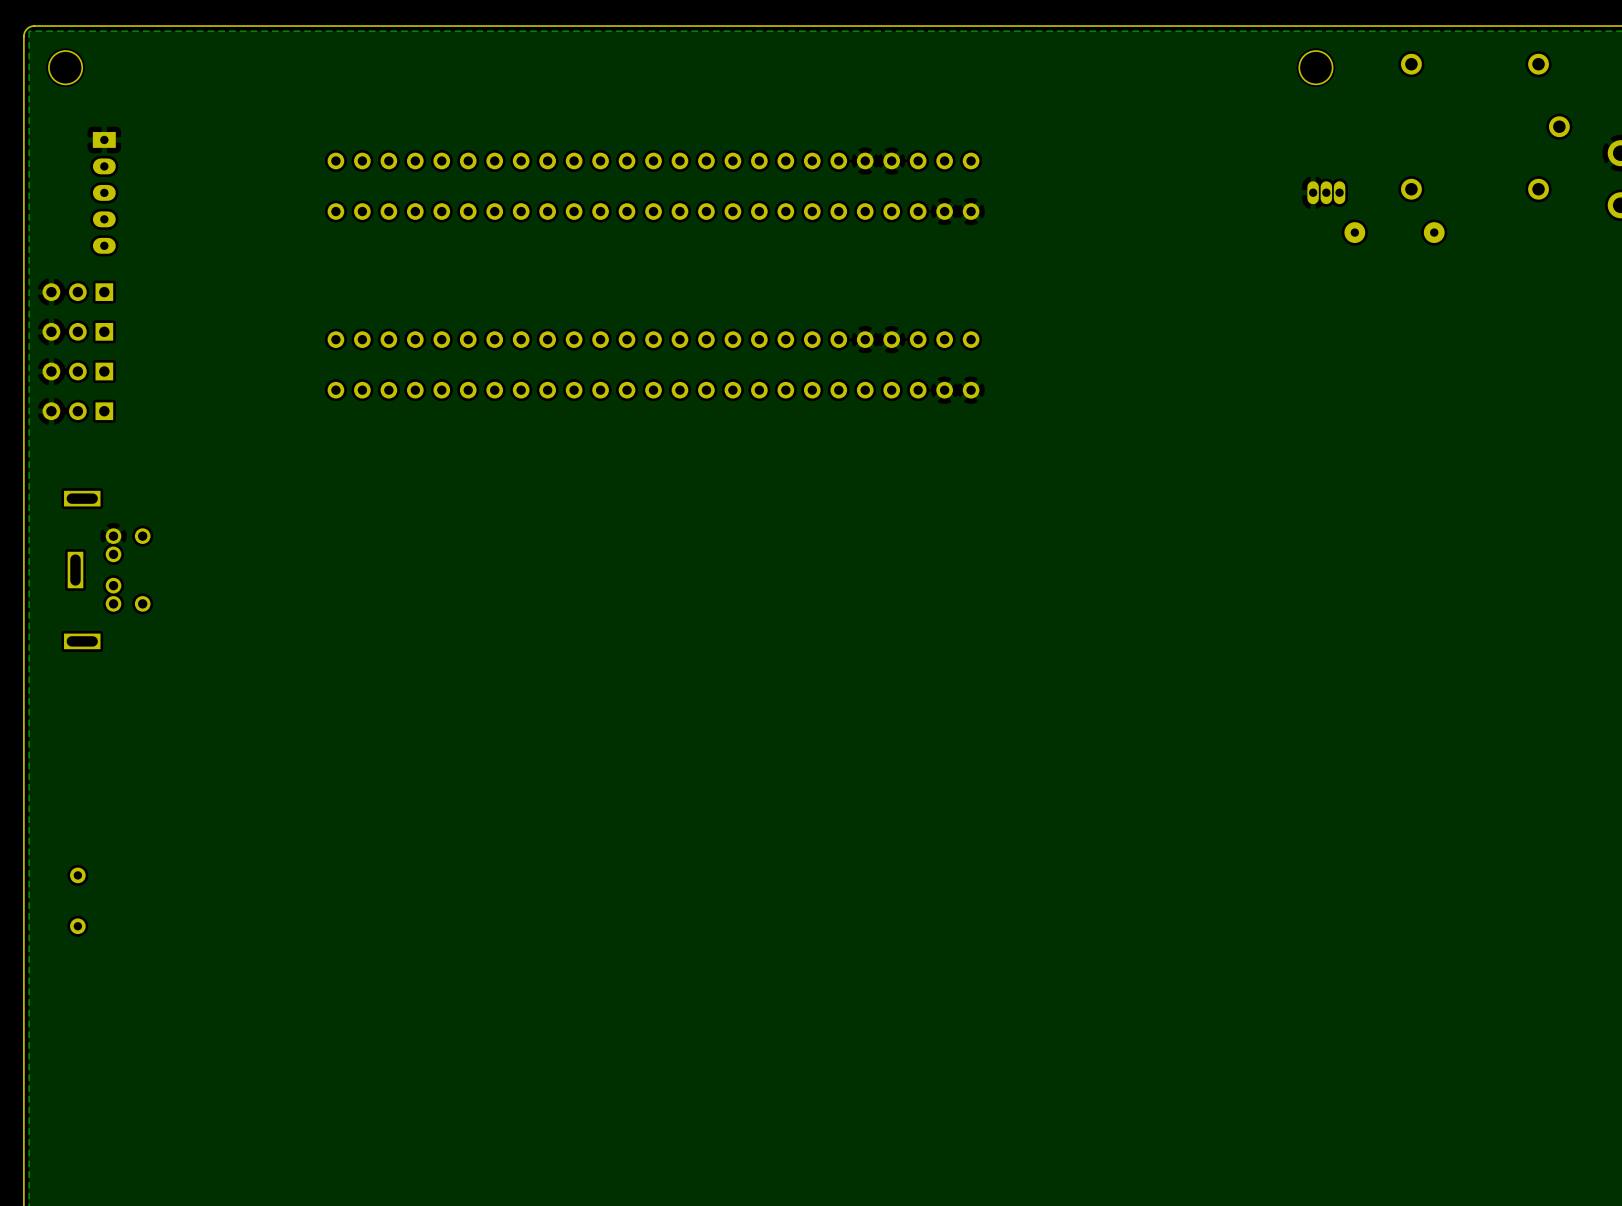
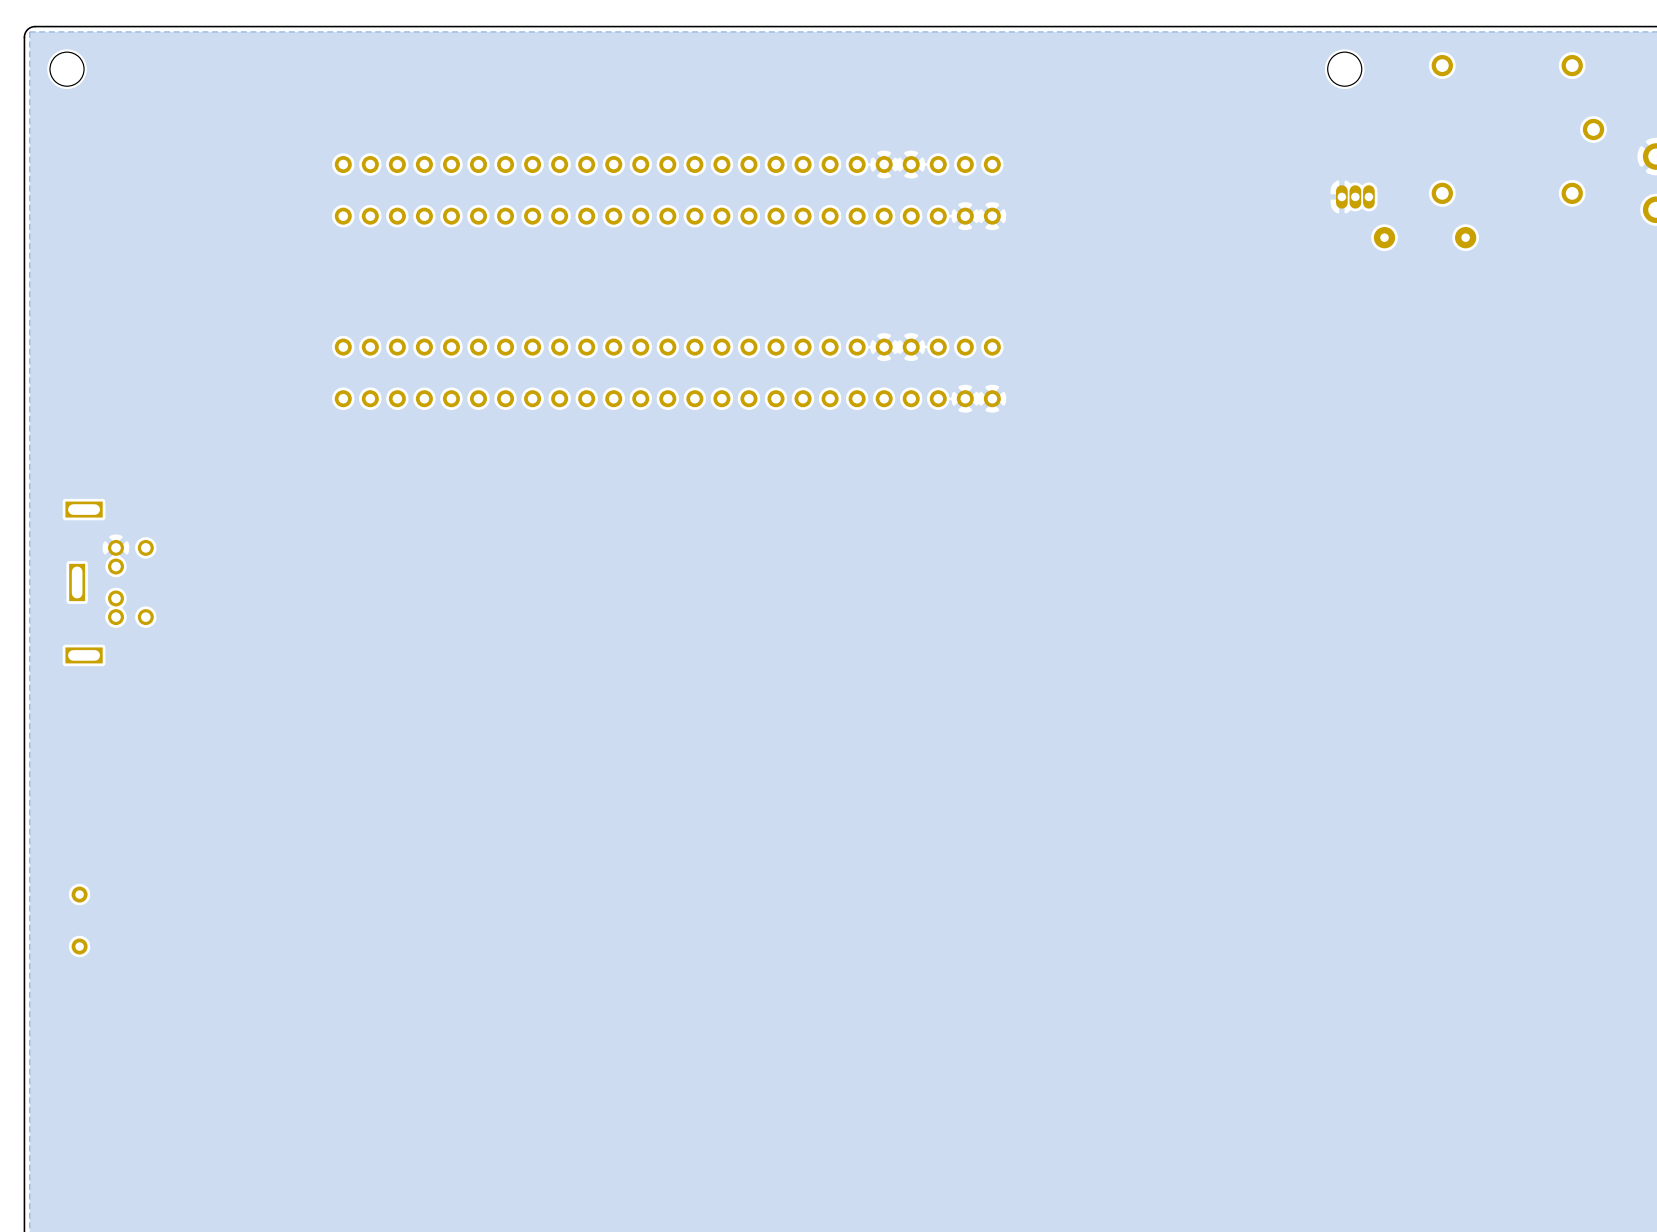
part: (104, 192) -> none
part: (77, 292) -> none
part: (77, 331) -> none
part: (77, 371) -> none
part: (77, 411) -> none

